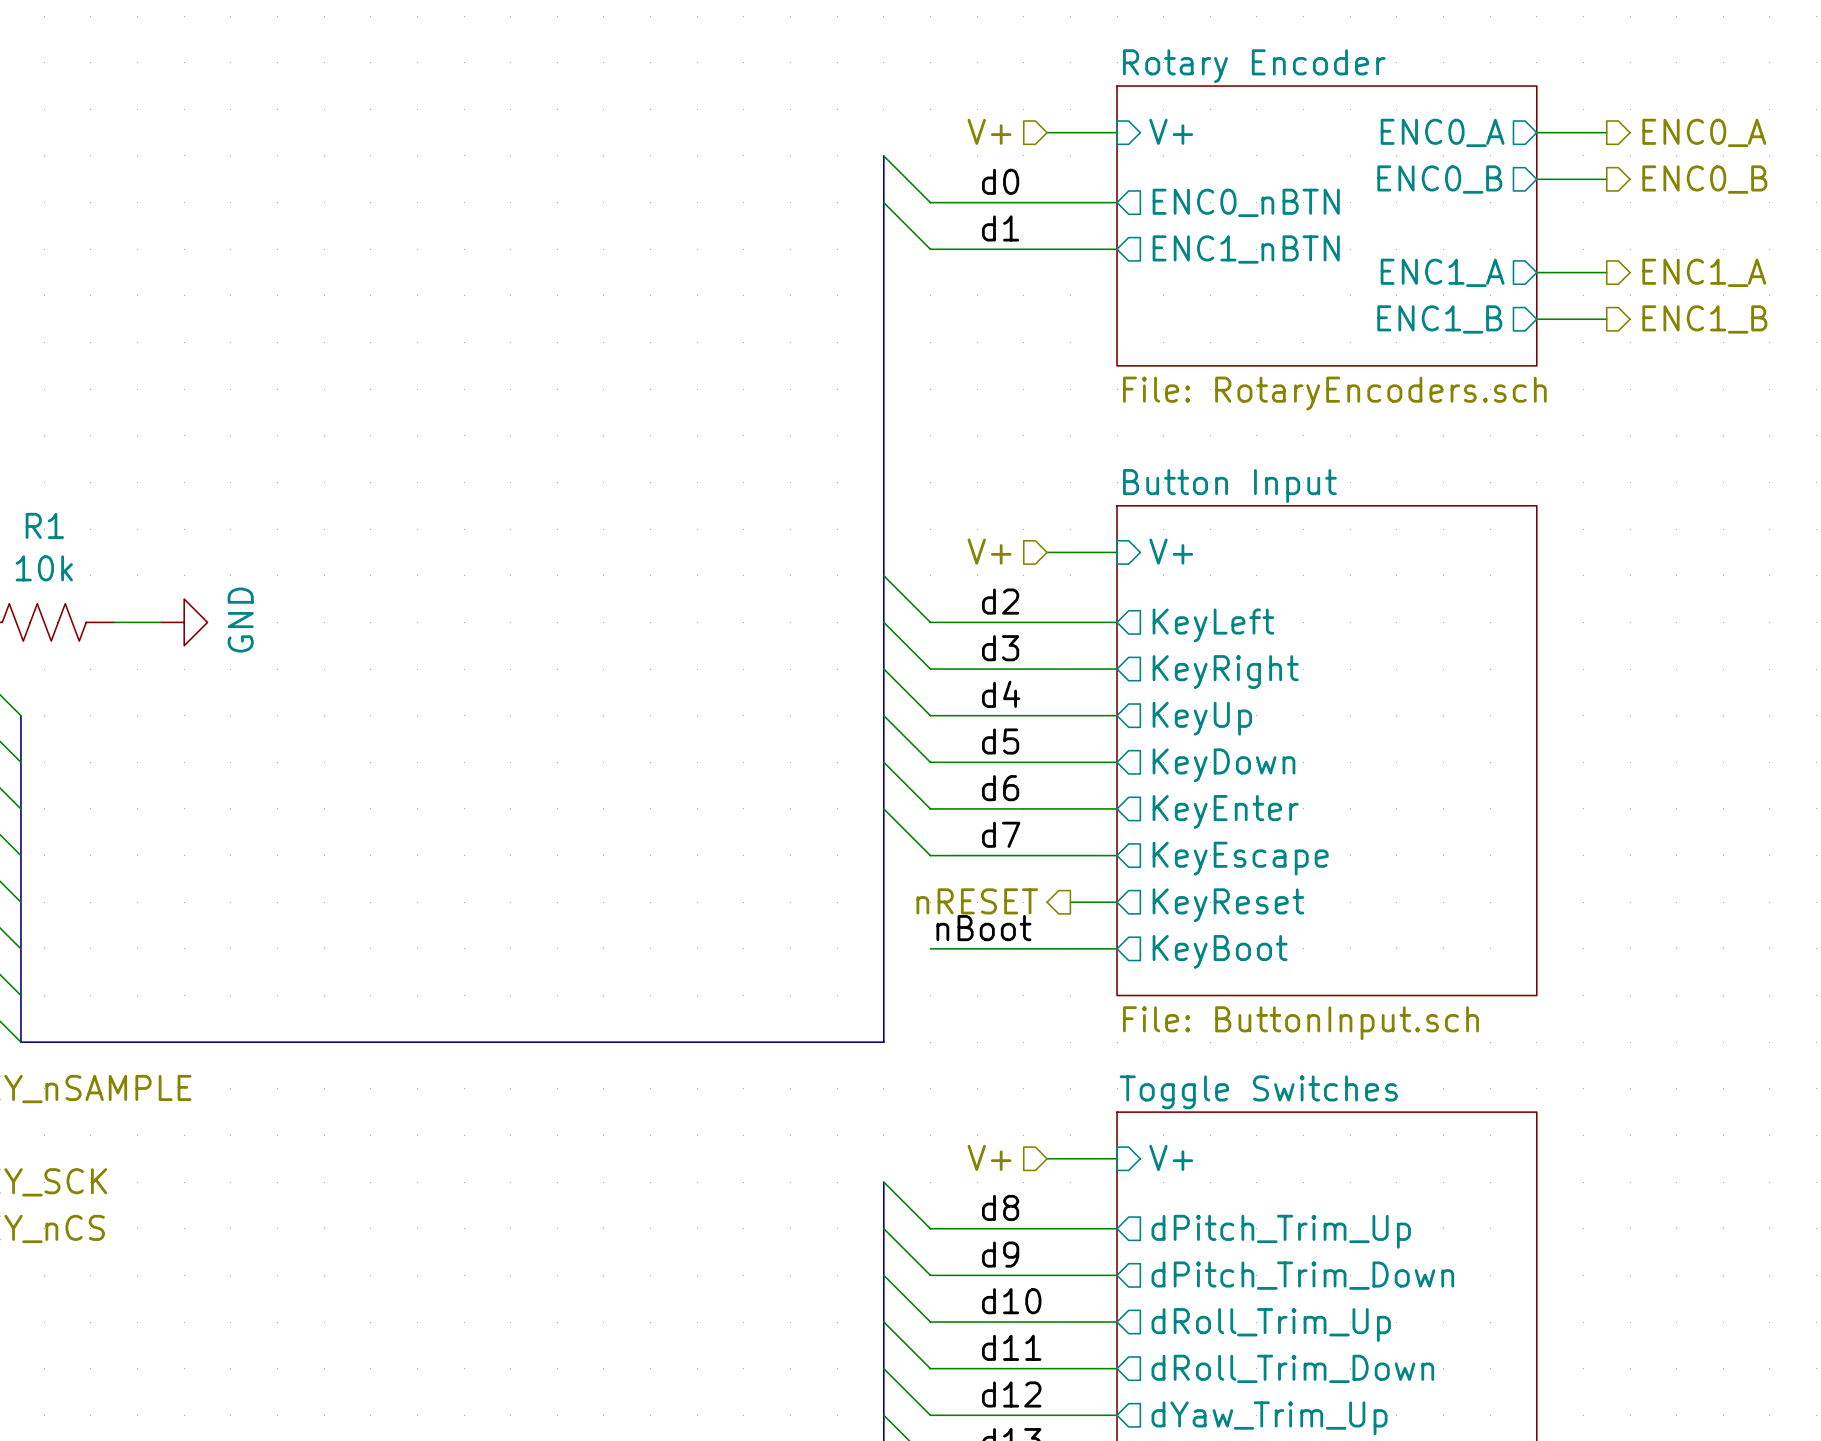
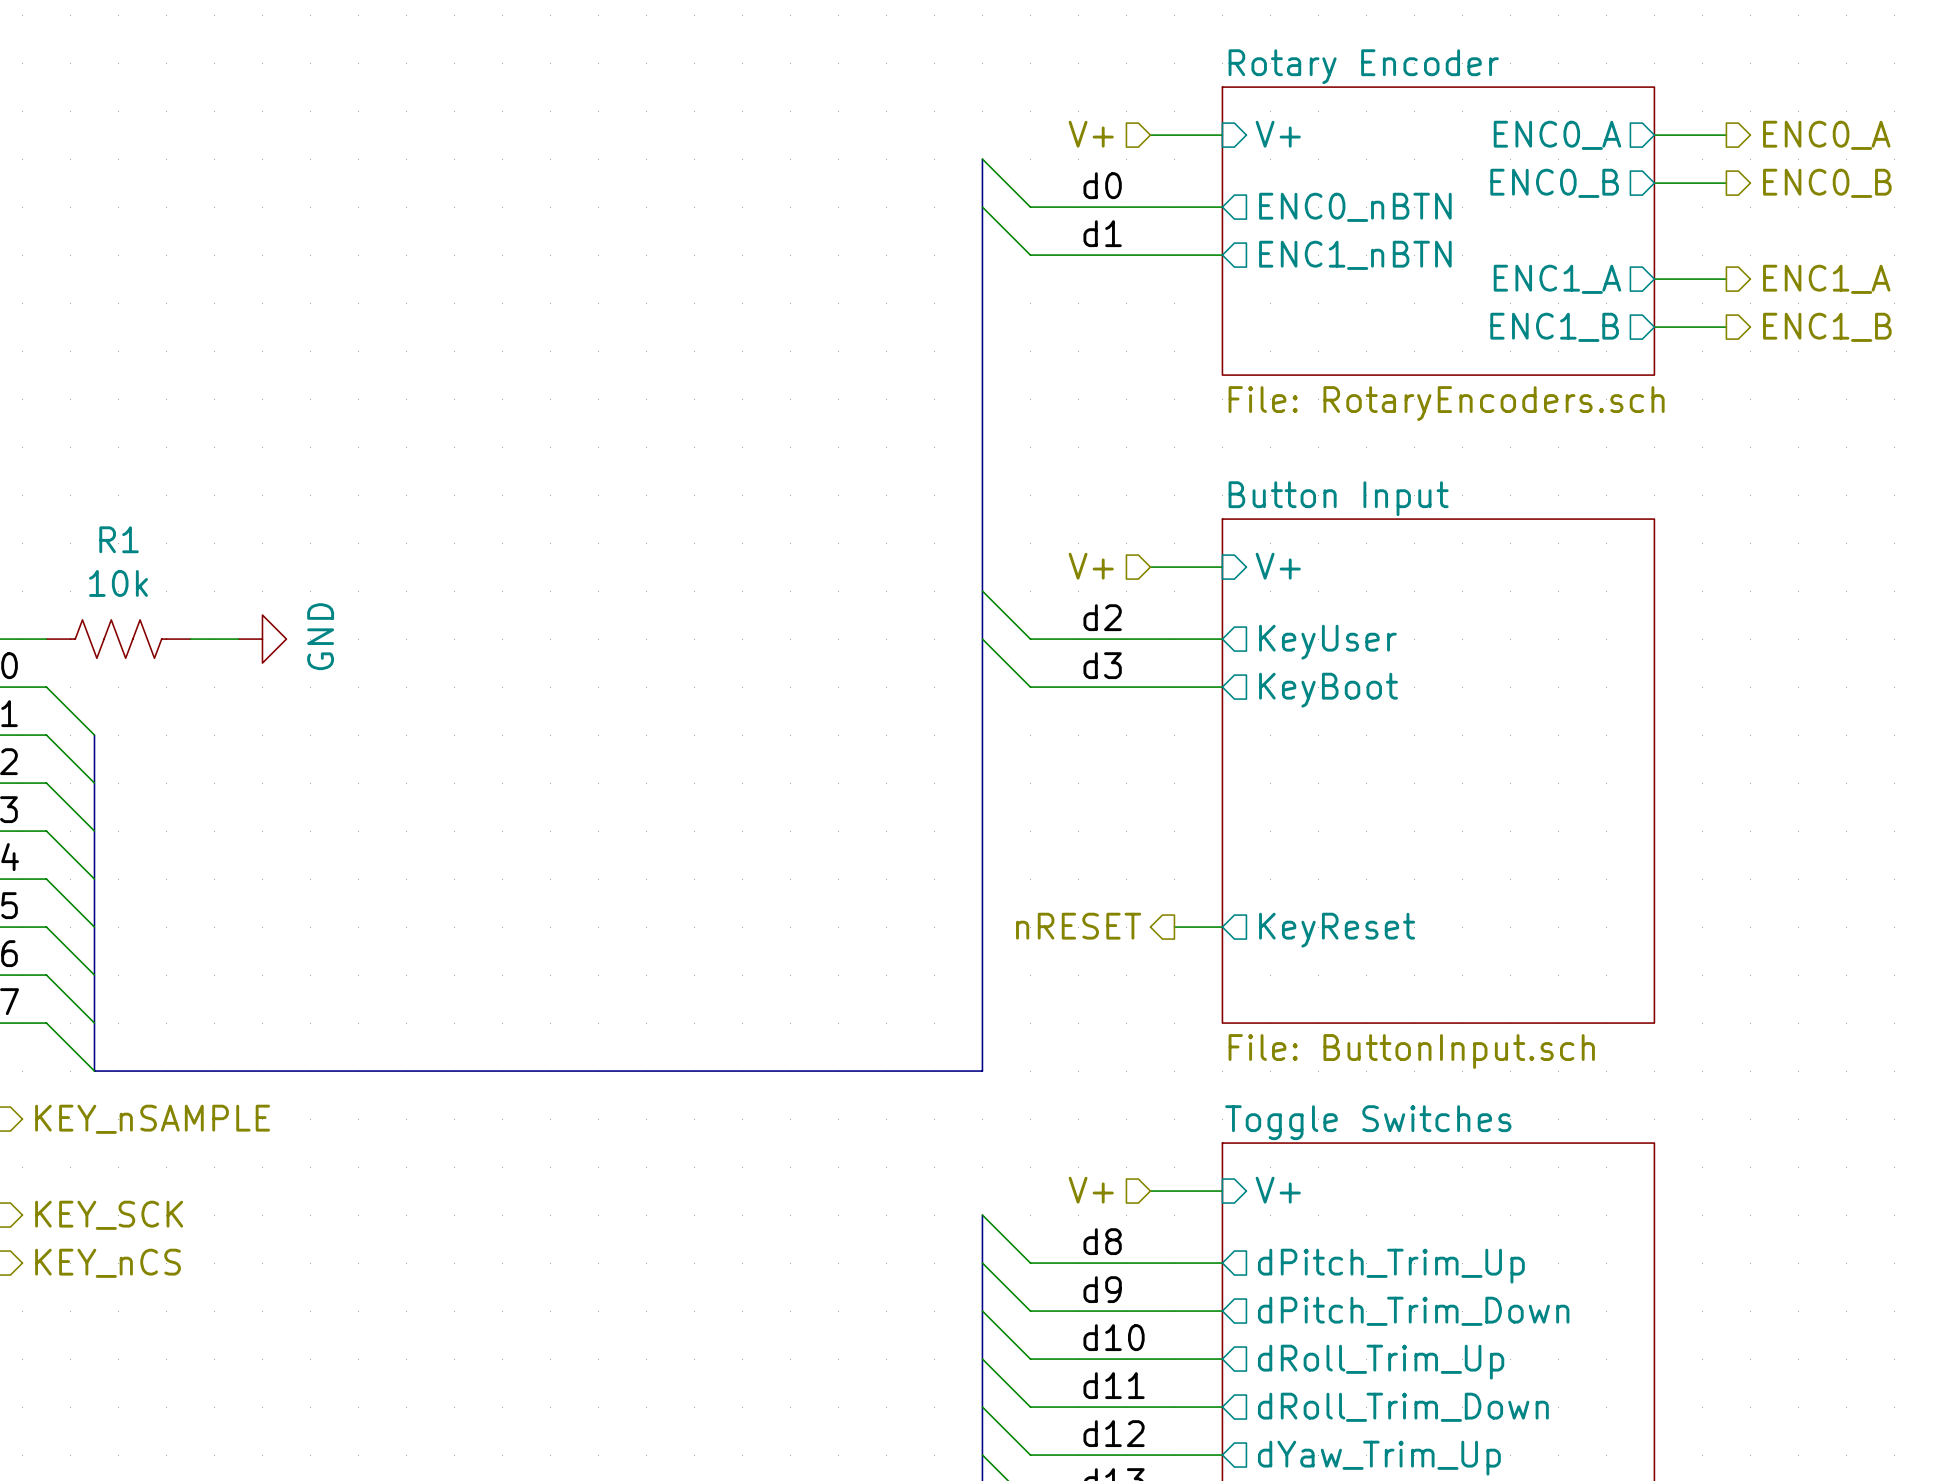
sheet pin: KeyLeft (1213, 625) -> KeyUser (1327, 642)
wire: (883, 669) (930, 715) (1117, 715) -> none
sheet pin: KeyRight (1225, 672) -> KeyBoot (1328, 690)
label: d4 (1001, 694) -> none
wire: (883, 715) (930, 762) (1117, 762) -> none
sheet pin: KeyUp (1202, 718) -> none
label: d5 (1000, 741) -> none
wire: (883, 762) (930, 808) (1117, 808) -> none
sheet pin: KeyDown (1223, 765) -> none
label: d6 (1000, 788) -> none
wire: (883, 808) (930, 855) (1117, 855) -> none
sheet pin: KeyEnter (1225, 811) -> none
label: d7 (1001, 834) -> none
sheet pin: KeyEscape (1240, 858) -> none
label: nBoot (983, 928) -> none
wire: (930, 948) (1117, 948) -> none
sheet pin: KeyBoot (1220, 951) -> none

